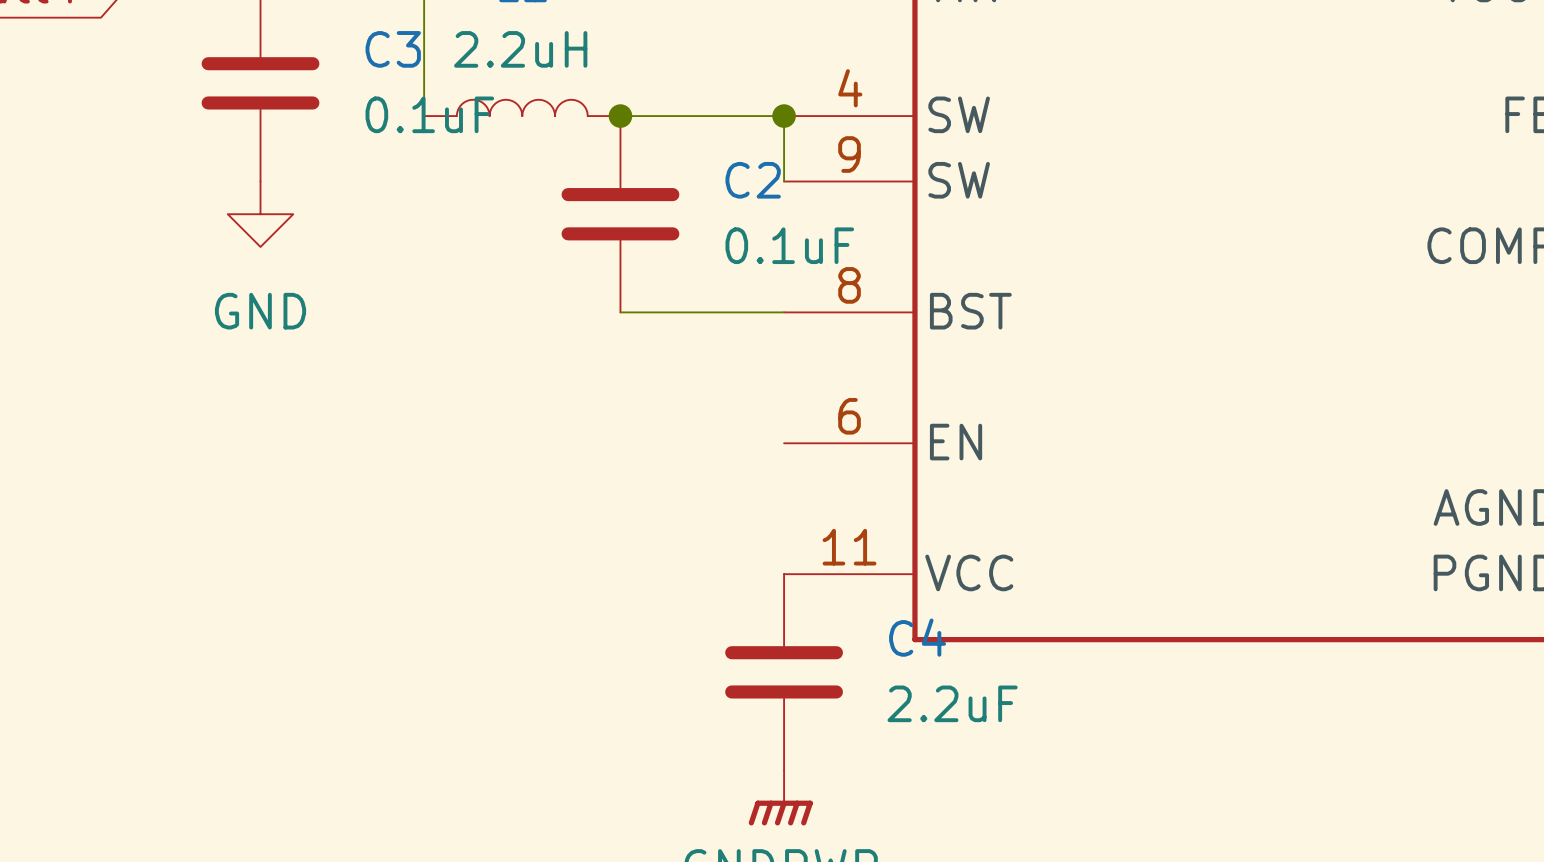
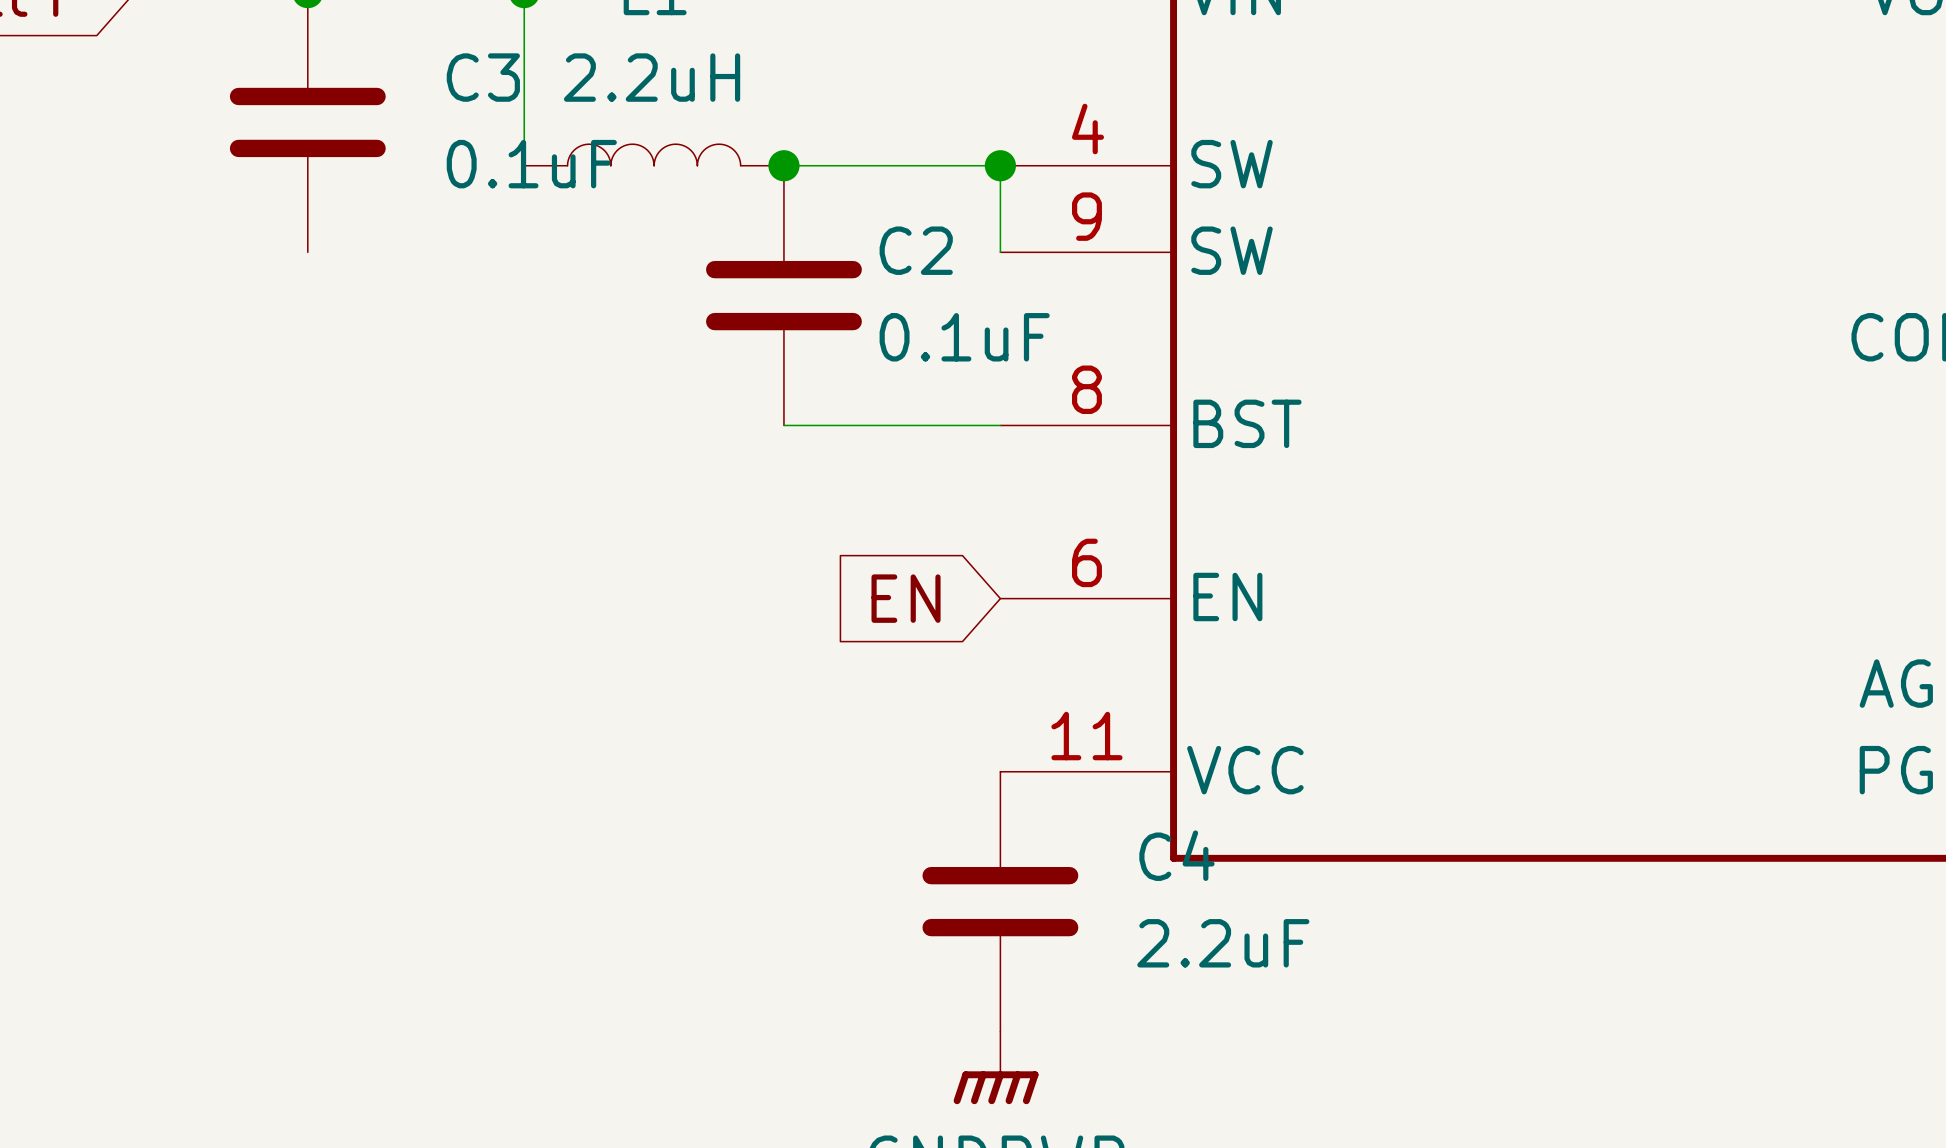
C2 name position: C2 (753, 180) -> C2 (916, 250)
power symbol: GND (260, 214) -> none
C2 value position: 0.1uF (789, 245) -> 0.1uF (964, 337)
global label: none -> EN (906, 598)

